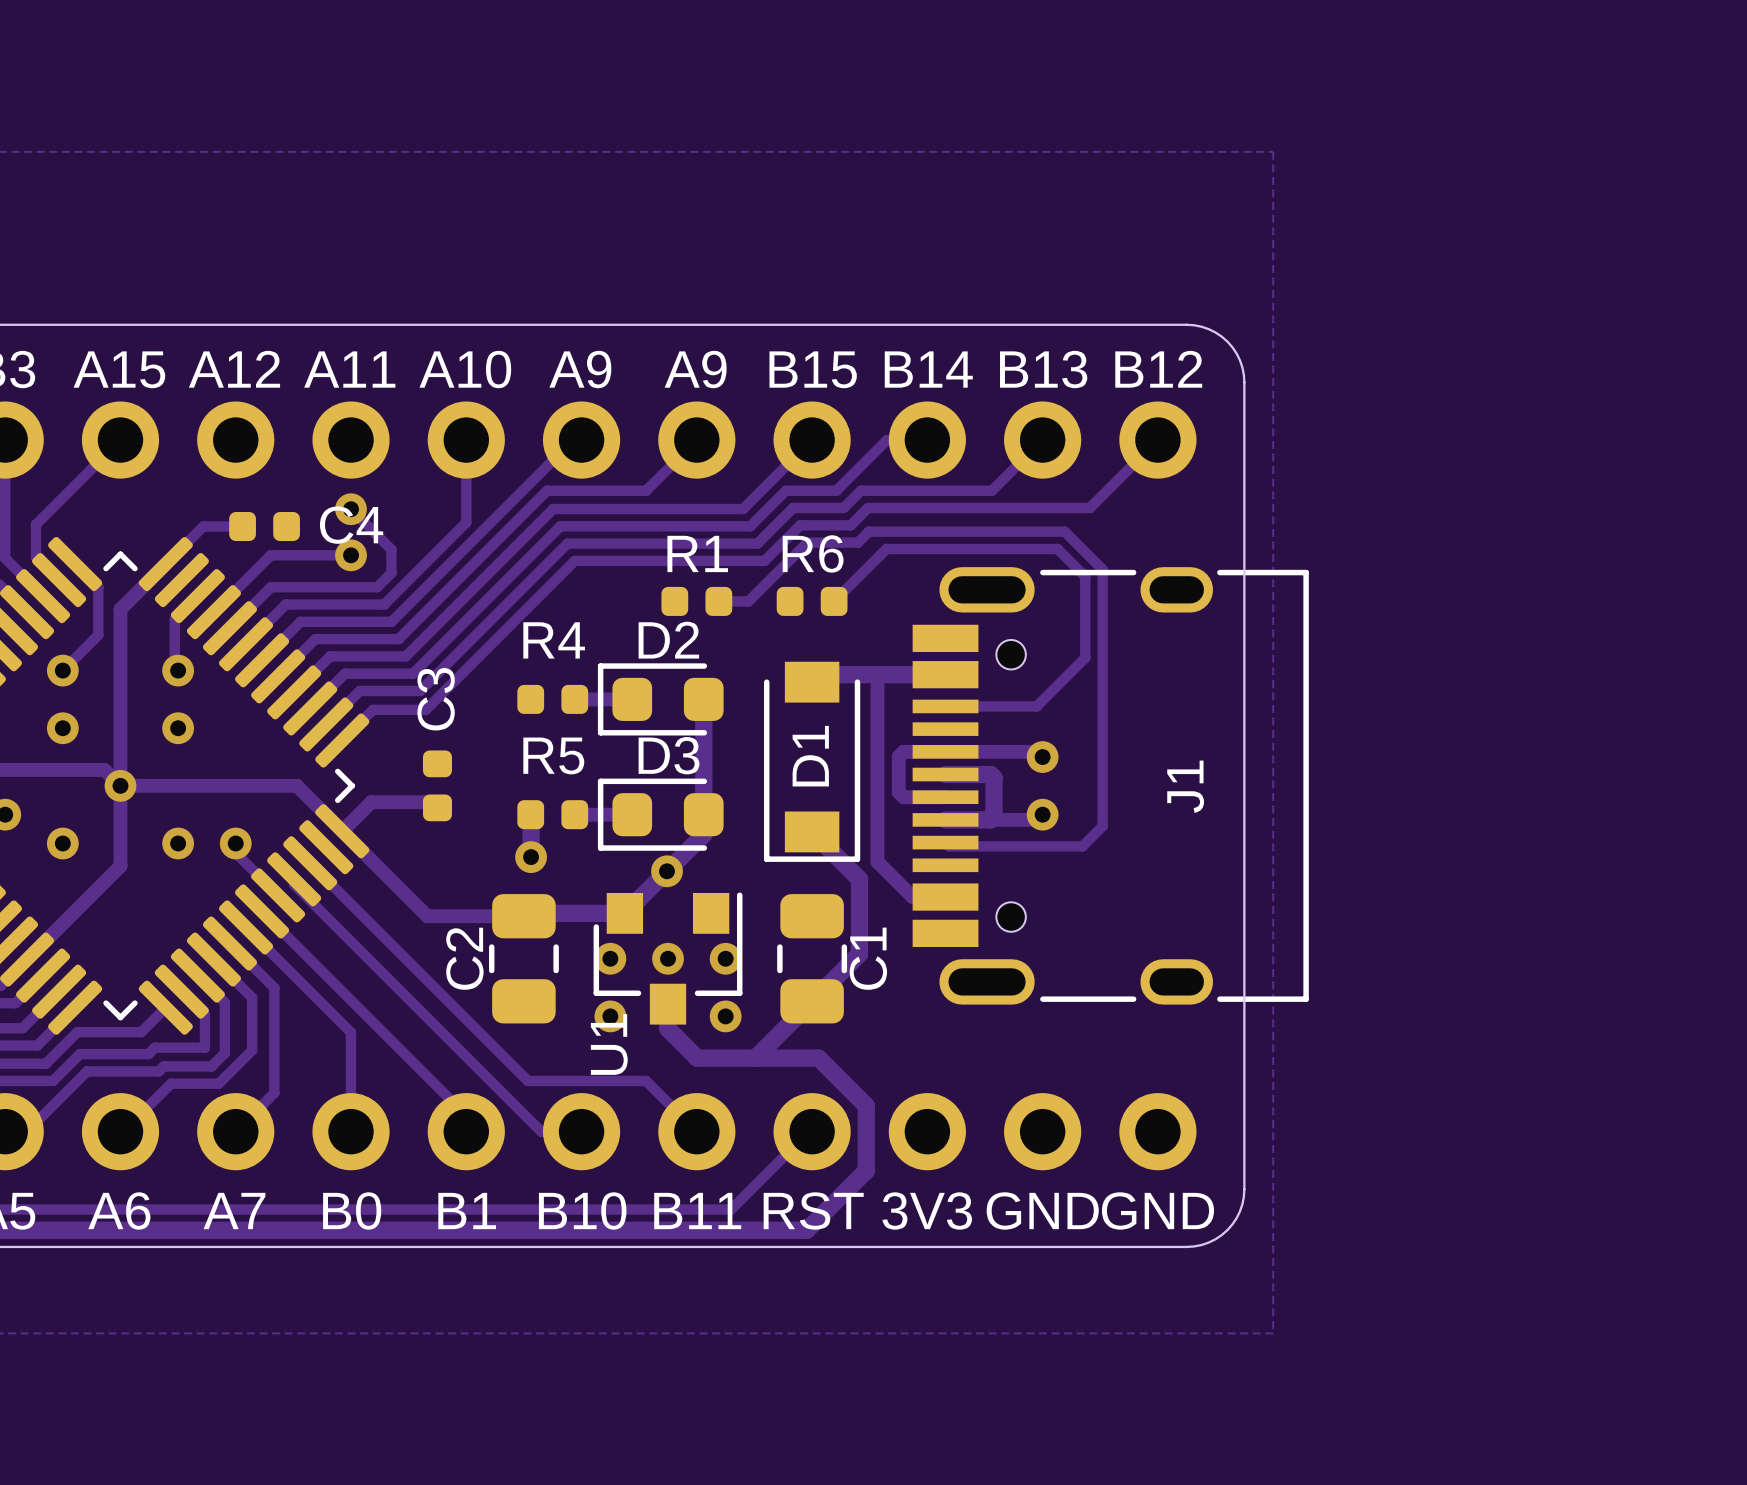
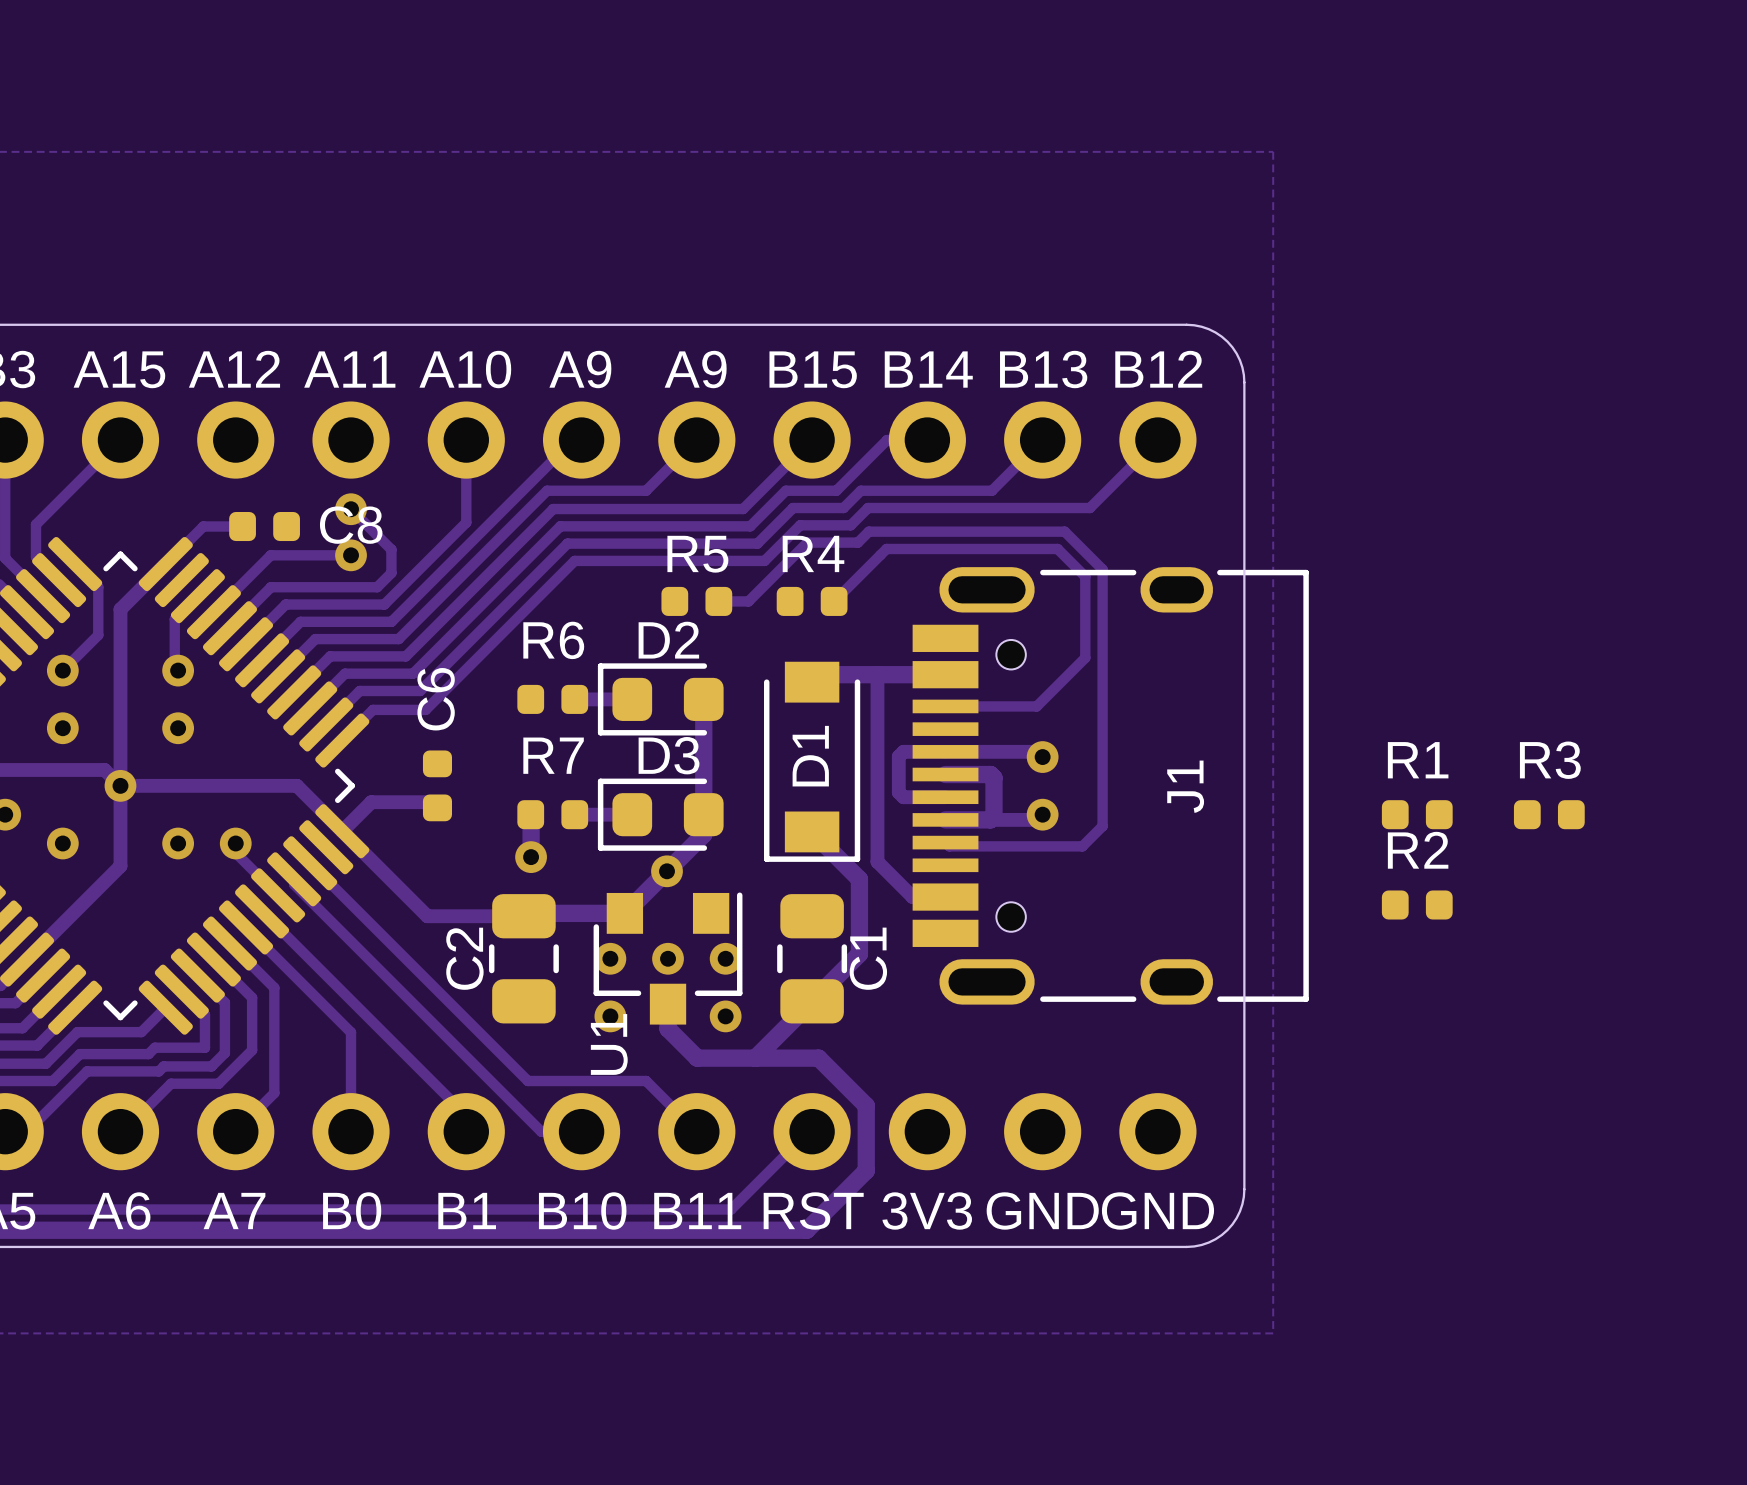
C4 name: C4 (351, 525) -> C8 (351, 525)
R1 name: R1 (697, 553) -> R5 (697, 554)
R6 name: R6 (813, 553) -> R4 (813, 553)
R4 name: R4 (554, 640) -> R6 (553, 640)
C3 name: C3 (436, 699) -> C6 (436, 699)
R5 name: R5 (553, 755) -> R7 (553, 755)
R1: none -> (1417, 814)
R3: none -> (1549, 814)
R2: none -> (1417, 904)

